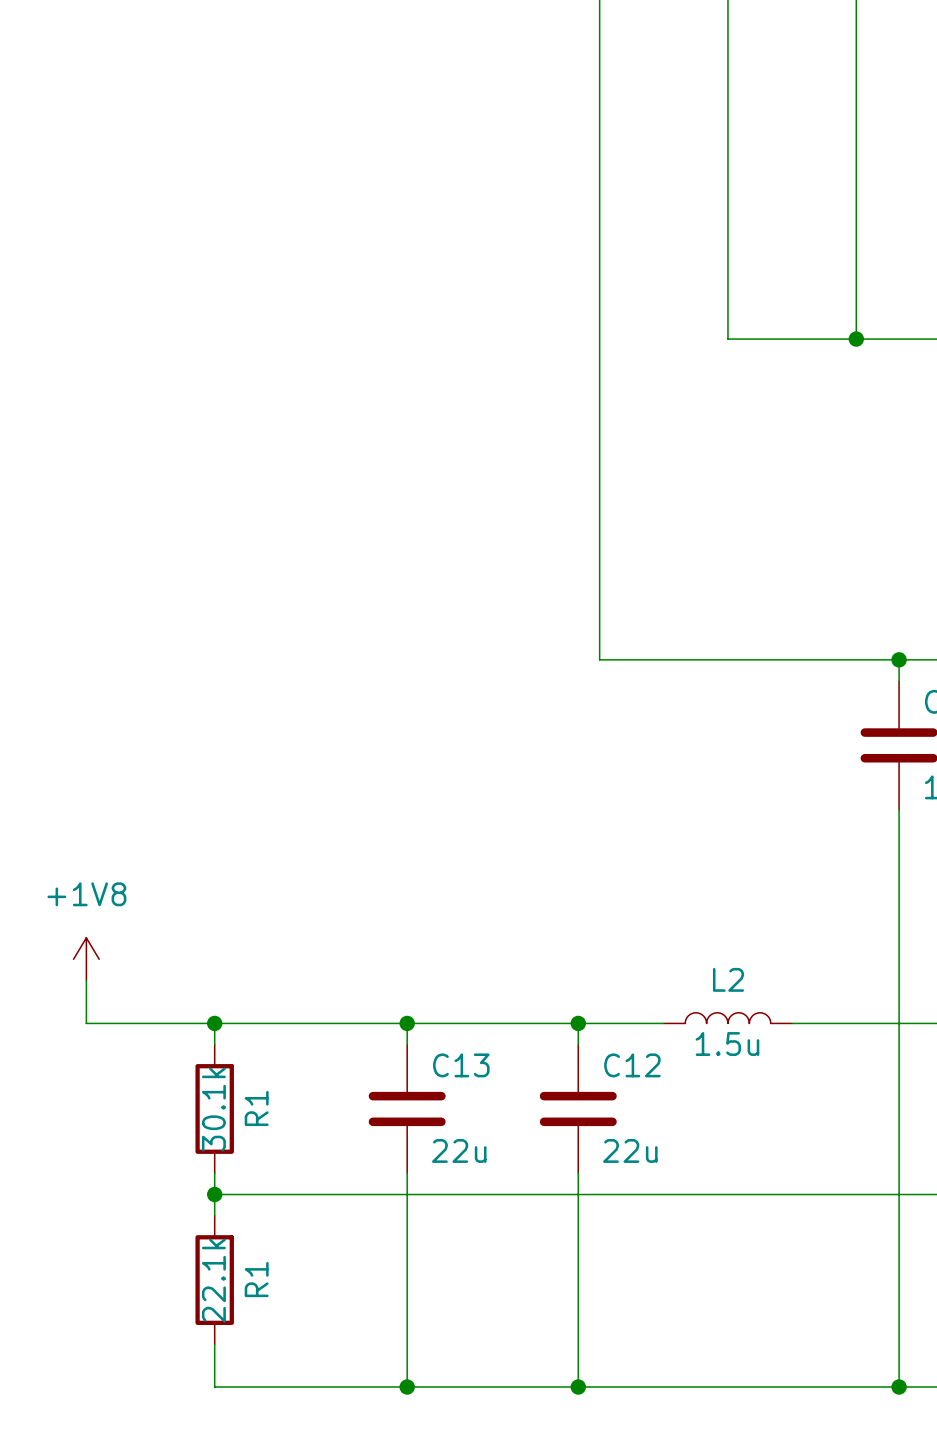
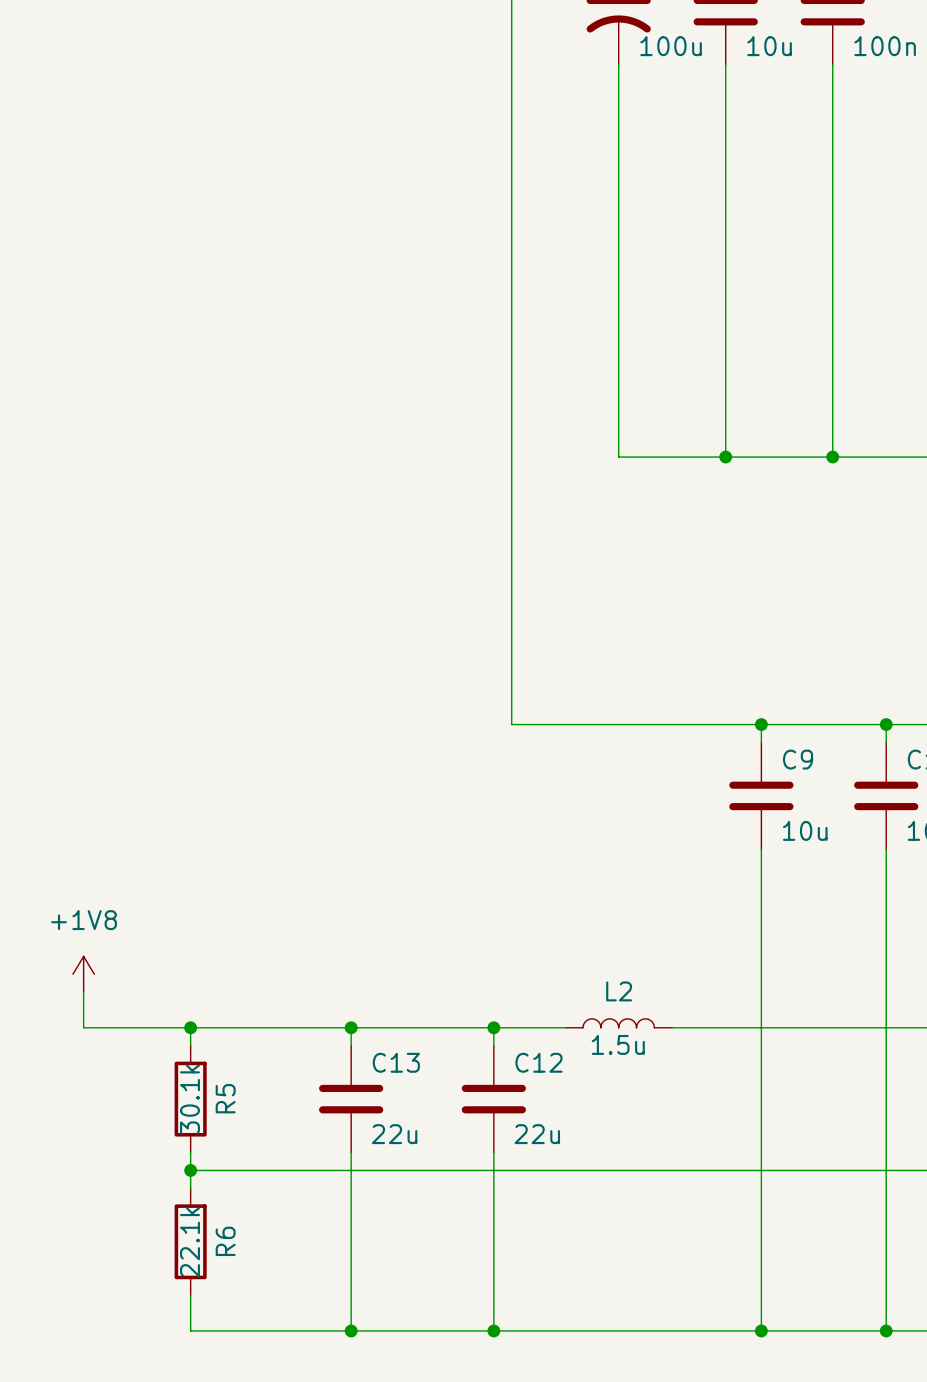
R1 name: R1 (256, 1108) -> R5 (225, 1098)
R1 name: R1 (256, 1279) -> R6 (225, 1241)

